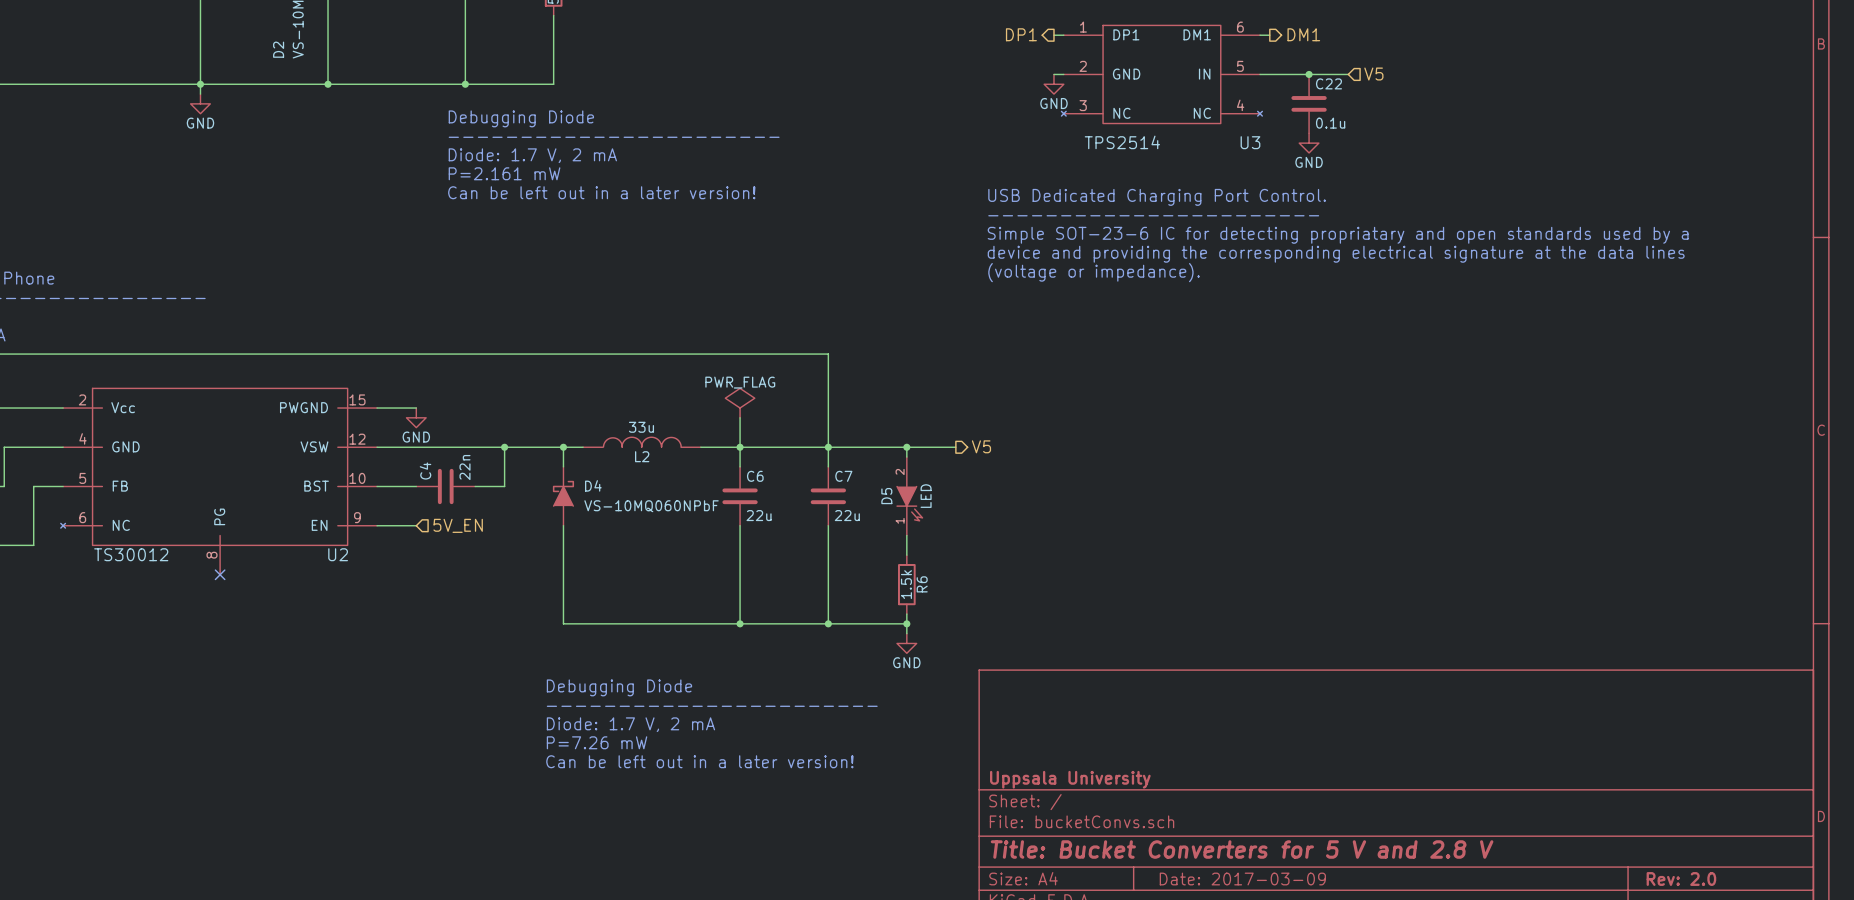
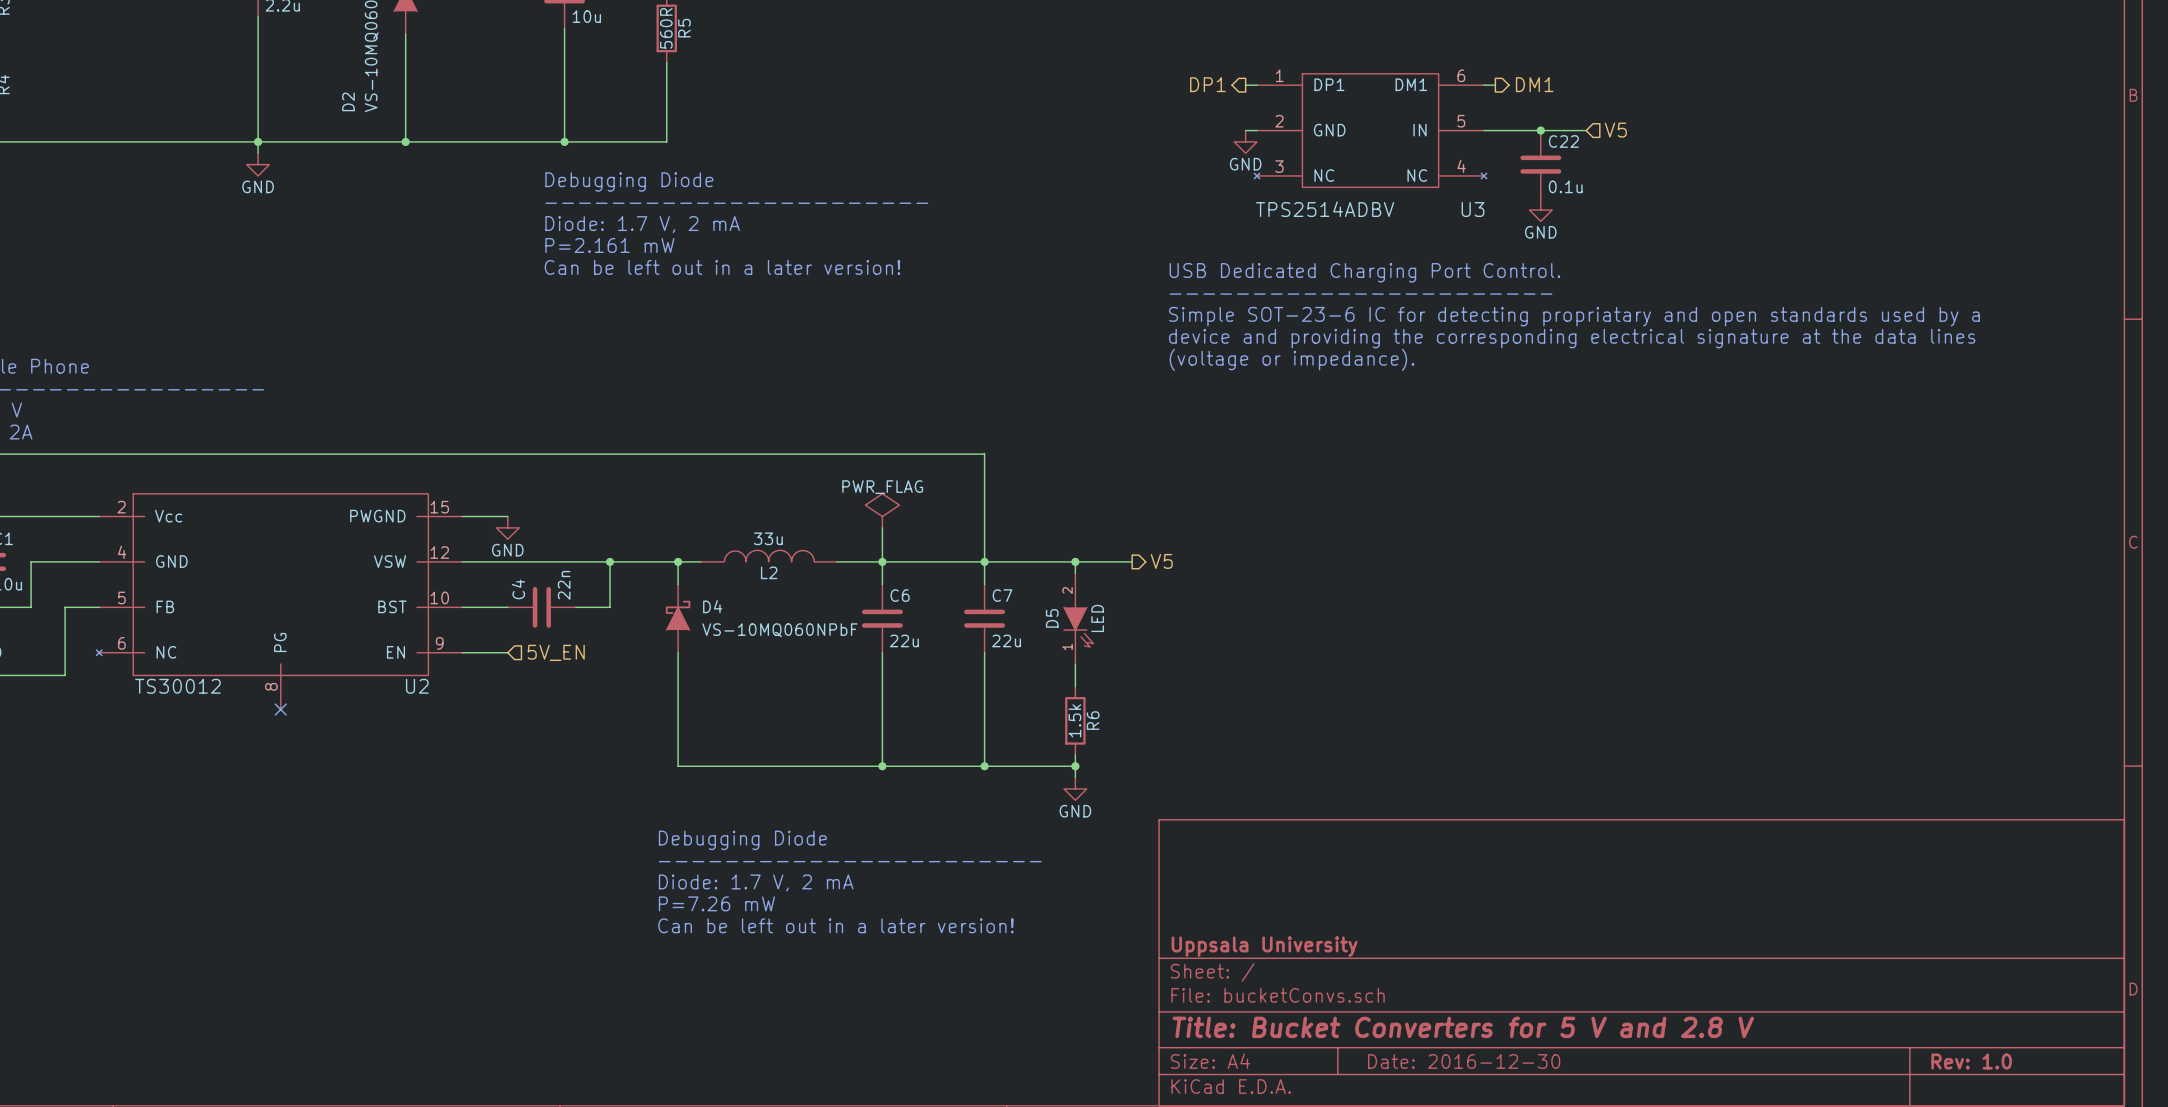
U3 value: TPS2514 (1122, 142) -> TPS2514ADBV (1325, 209)
title block: Date: 2017-03-09 (1242, 879) -> Date: 2016-12-30 (1464, 1061)
title block: Rev: 2.0 (1681, 879) -> Rev: 1.0 (1971, 1061)

